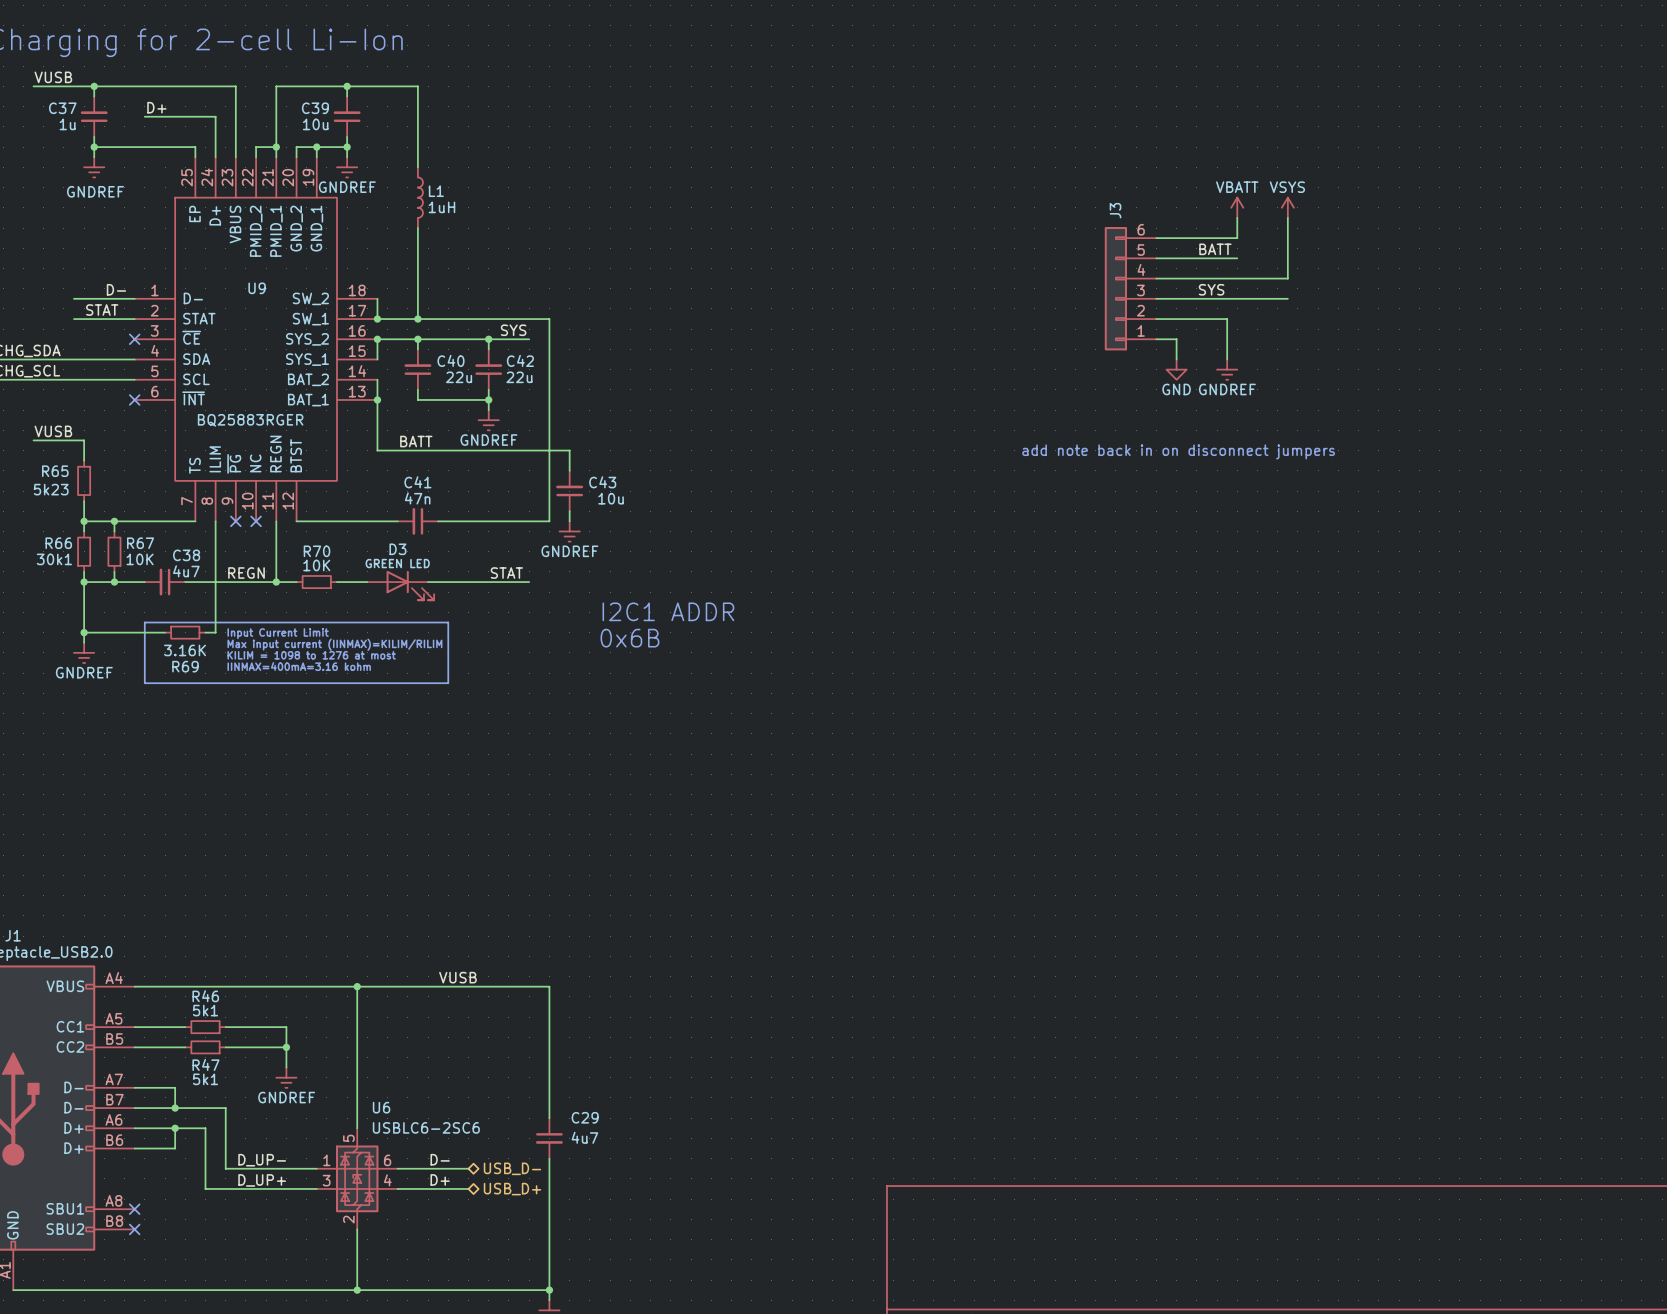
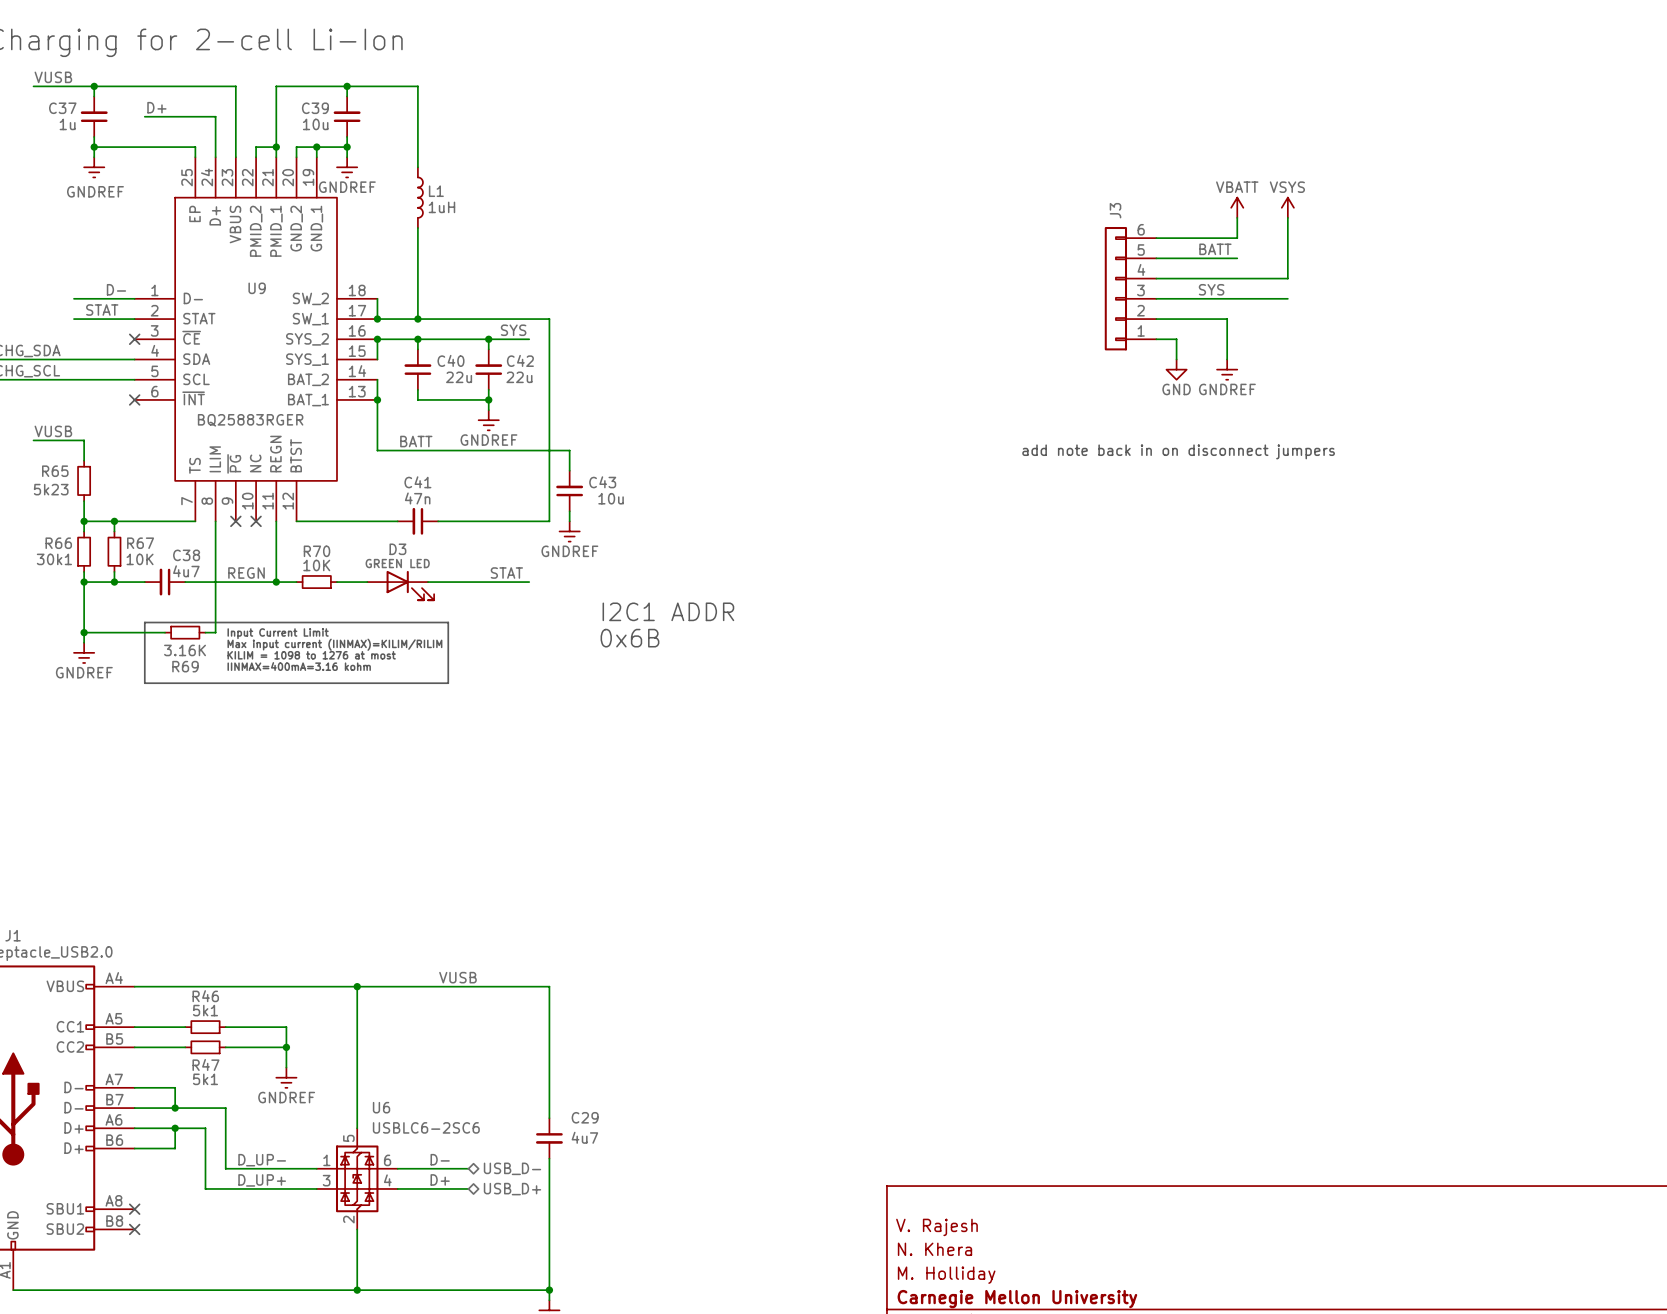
title block: none -> V. Rajesh (936, 1227)
title block: none -> N. Khera (934, 1249)
title block: none -> M. Holliday (946, 1275)
title block: none -> Carnegie Mellon University (1017, 1299)

